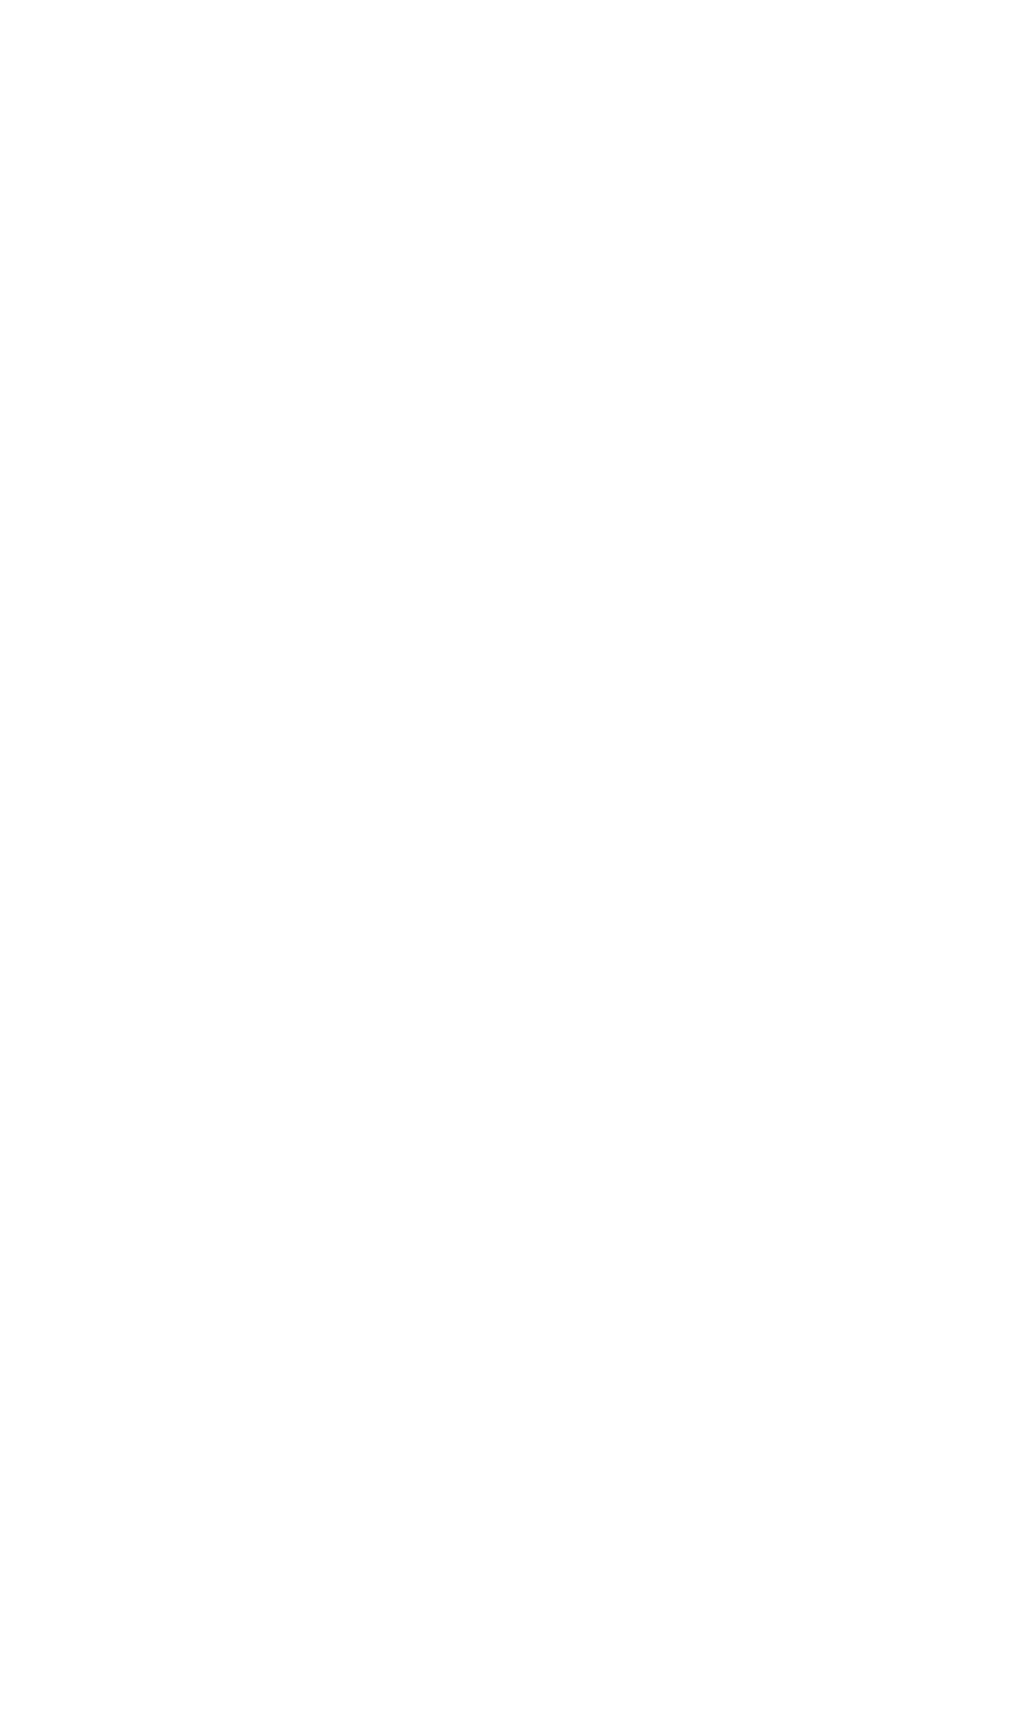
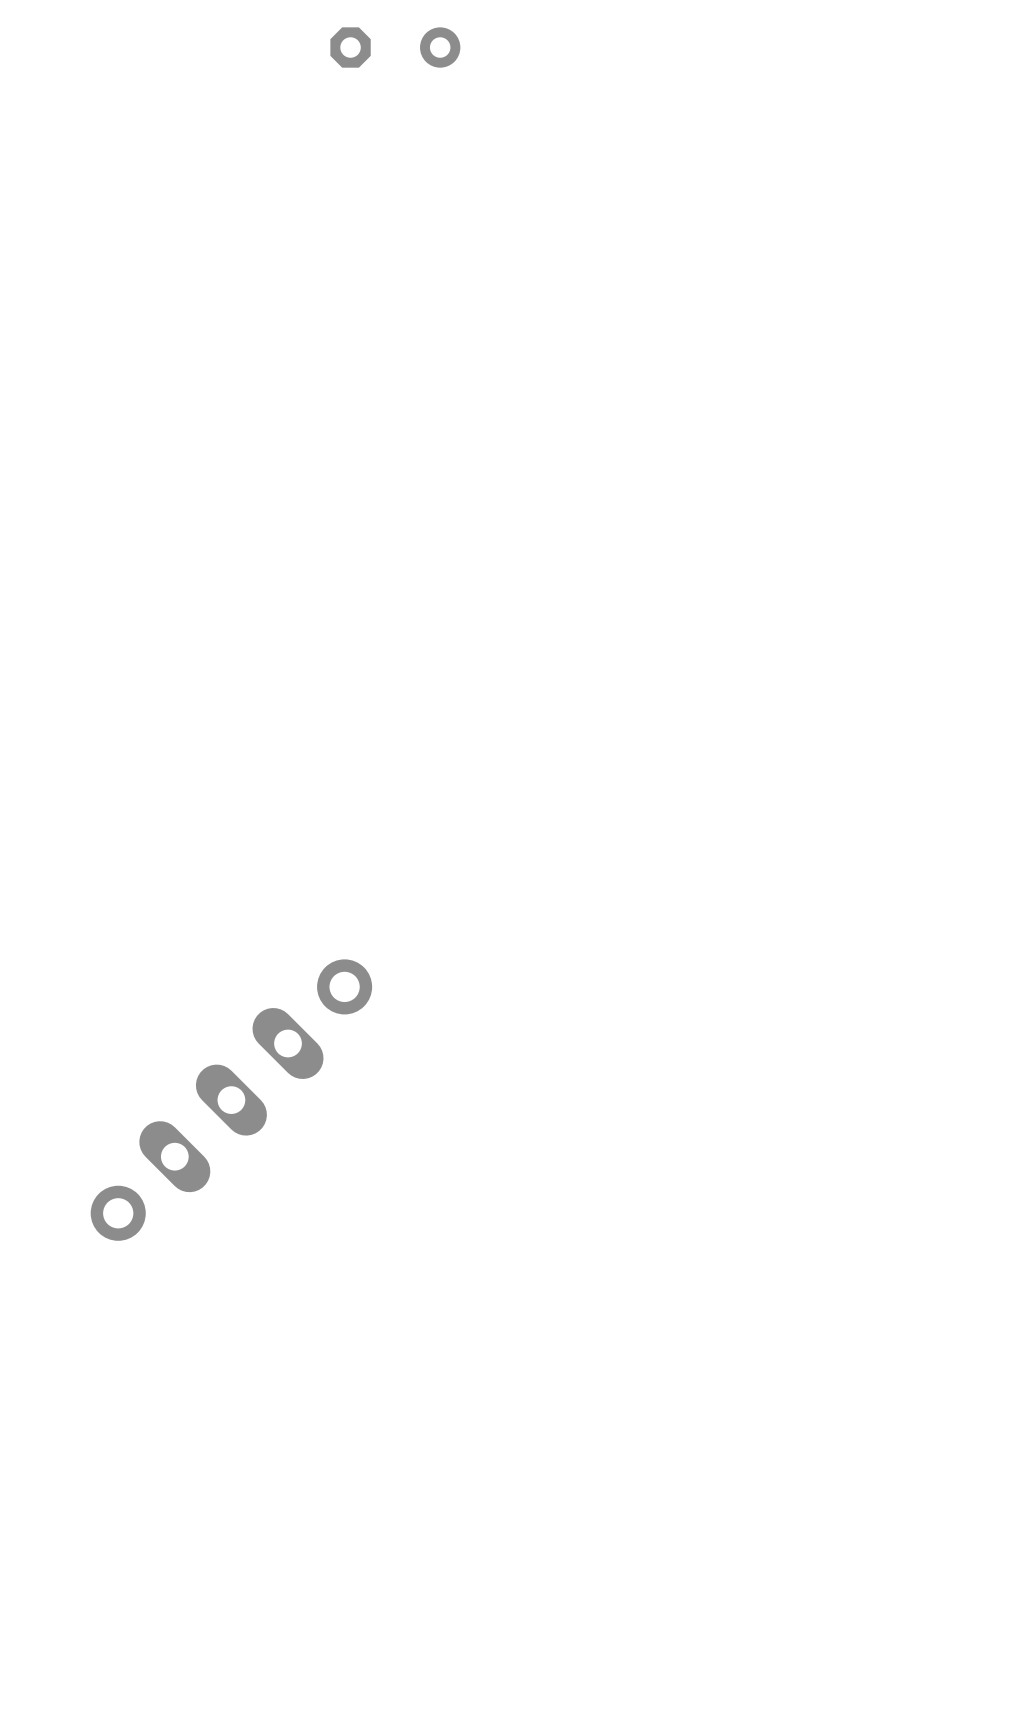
part: none -> (395, 47)
part: none -> (231, 1100)

